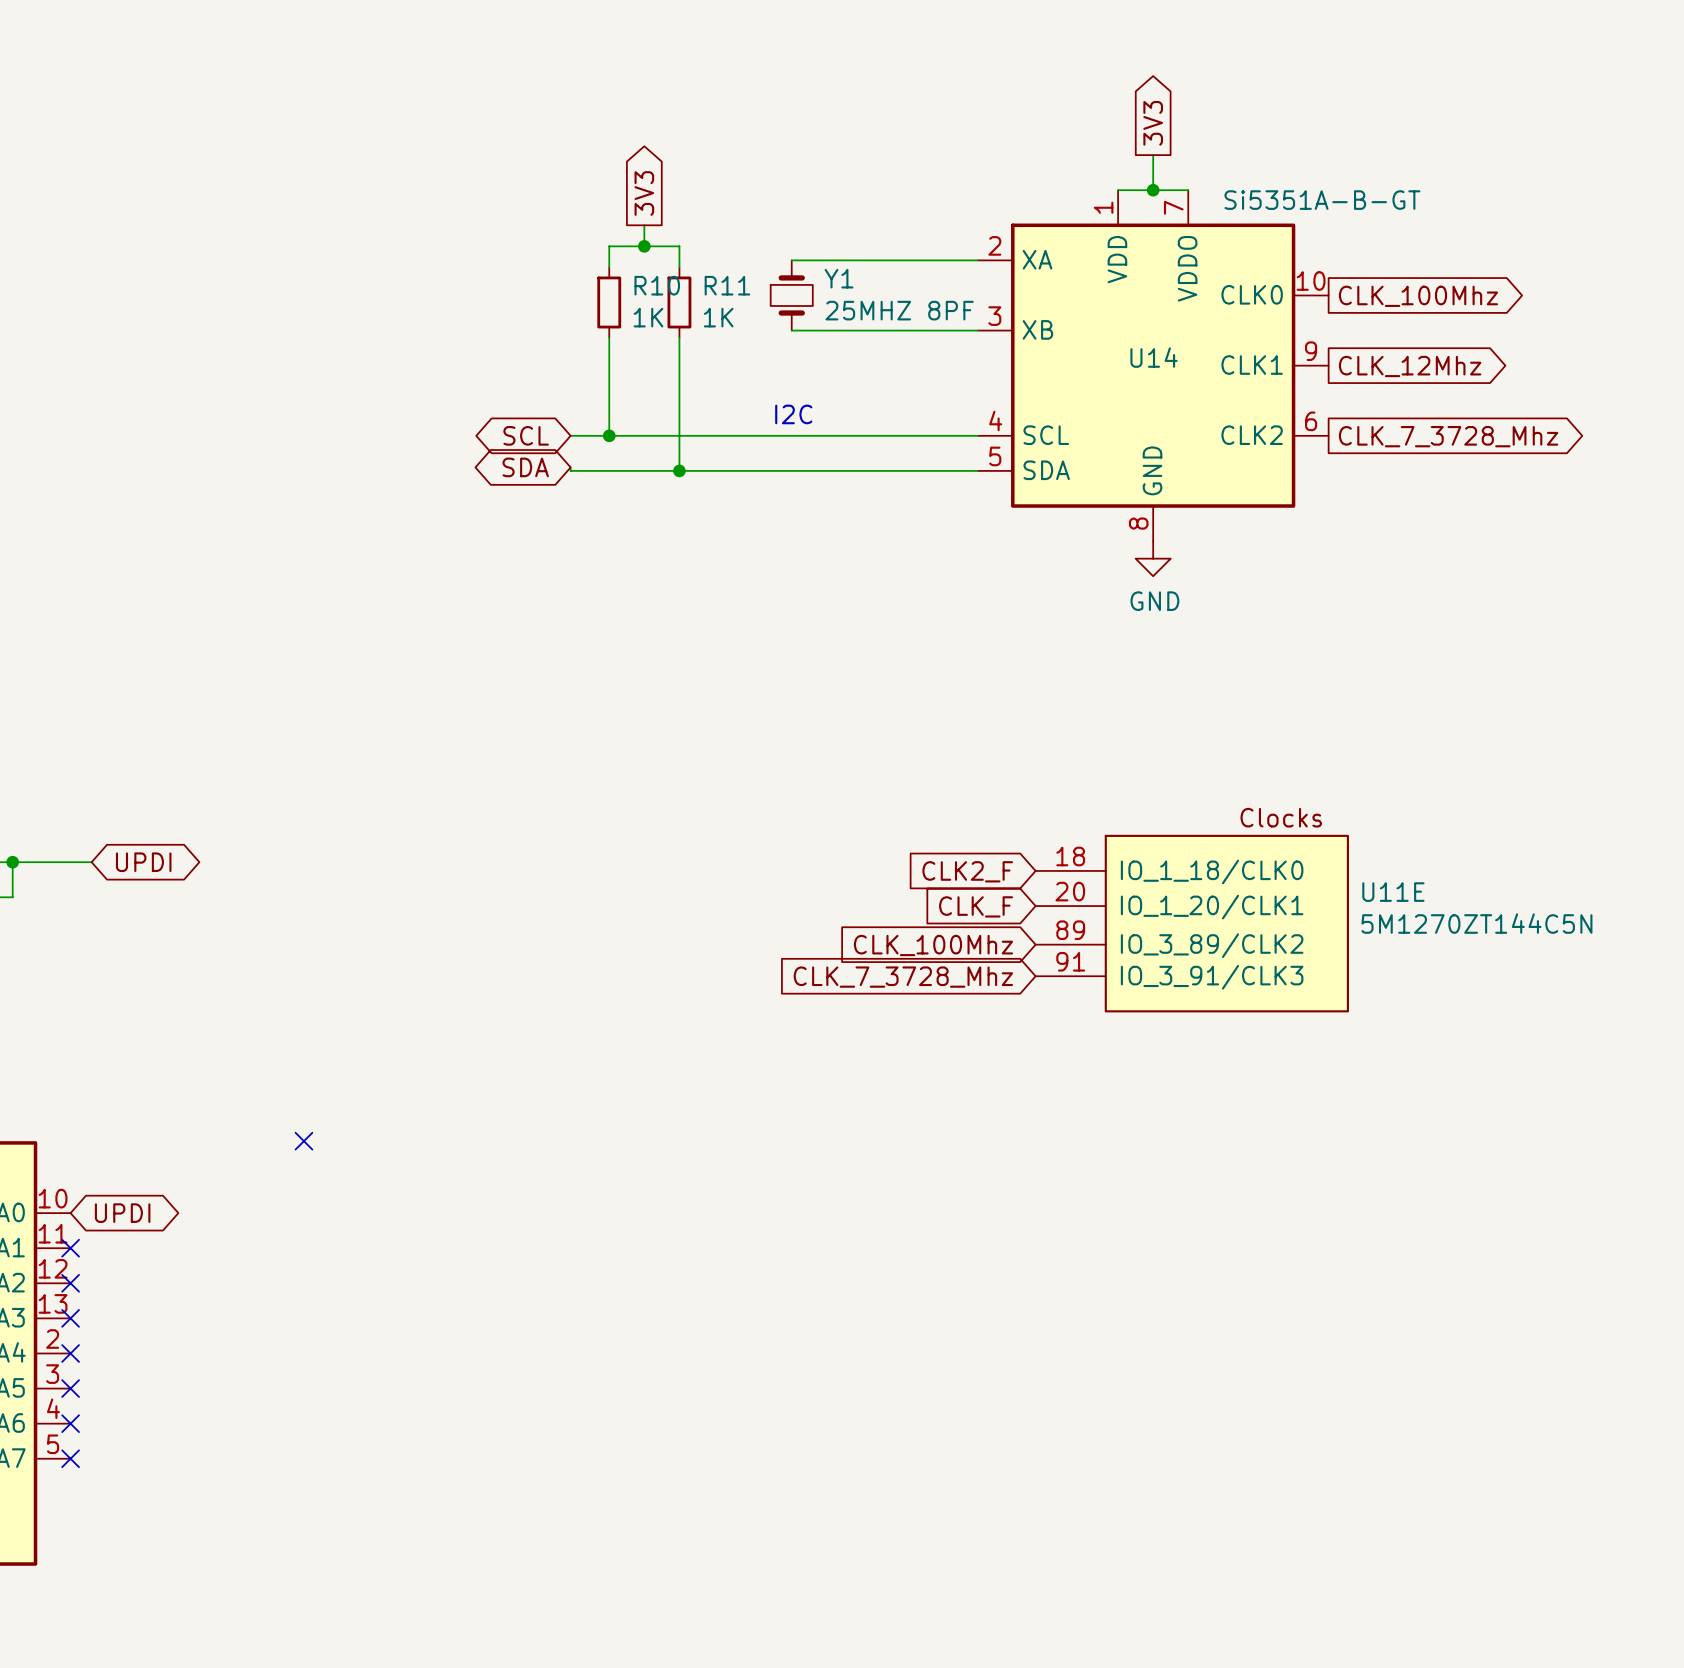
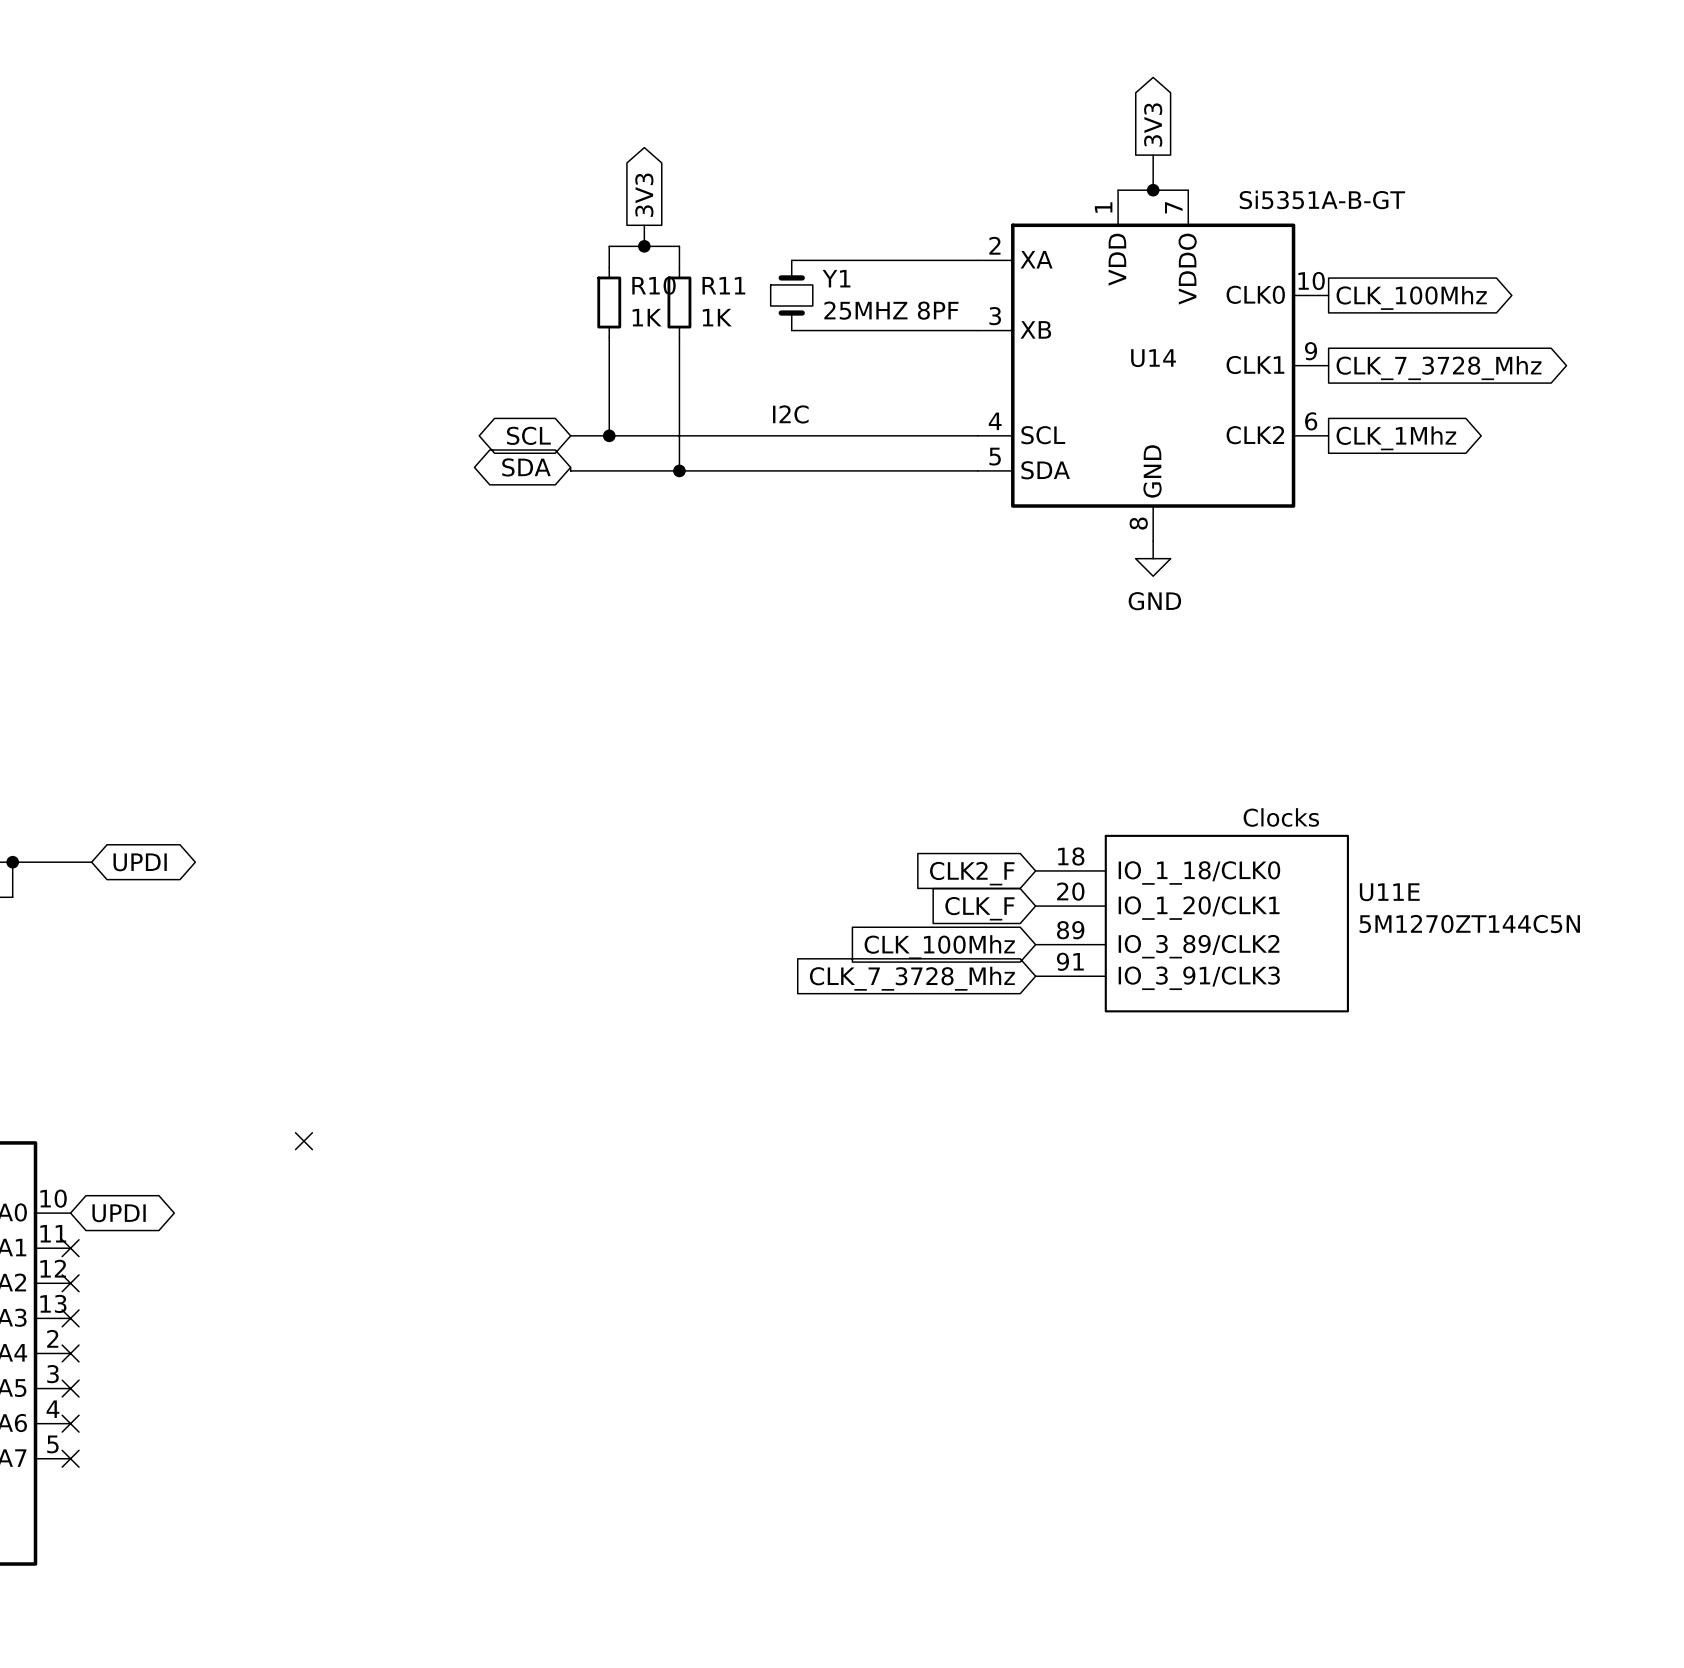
global label: CLK_12Mhz (1410, 366) -> CLK_7_3728_Mhz (1439, 368)
global label: CLK_7_3728_Mhz (1448, 436) -> CLK_1Mhz (1396, 438)

